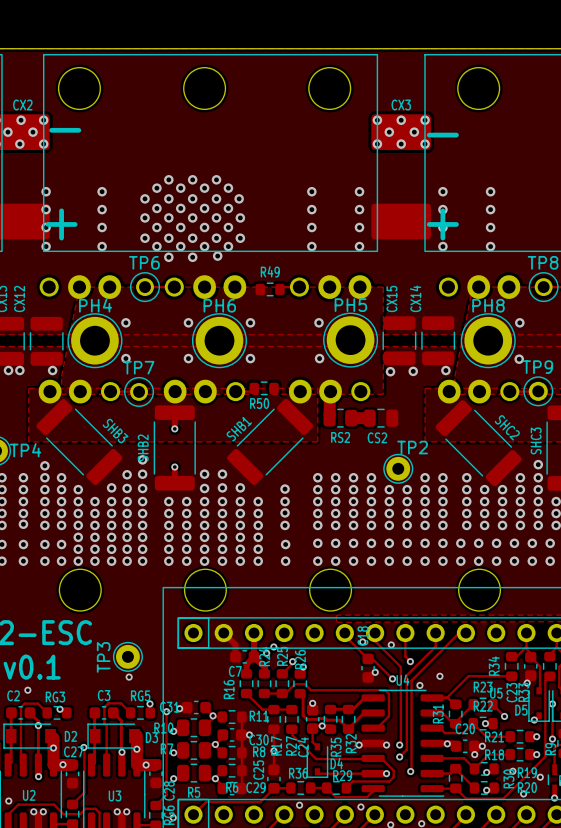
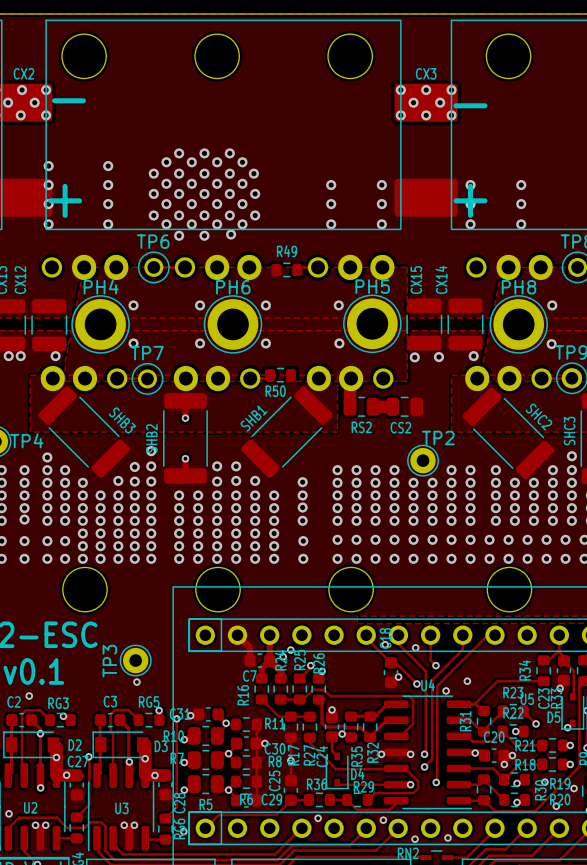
via: (311, 191) -> none
via: (359, 191) -> none
via: (442, 191) -> none
via: (490, 191) -> none

